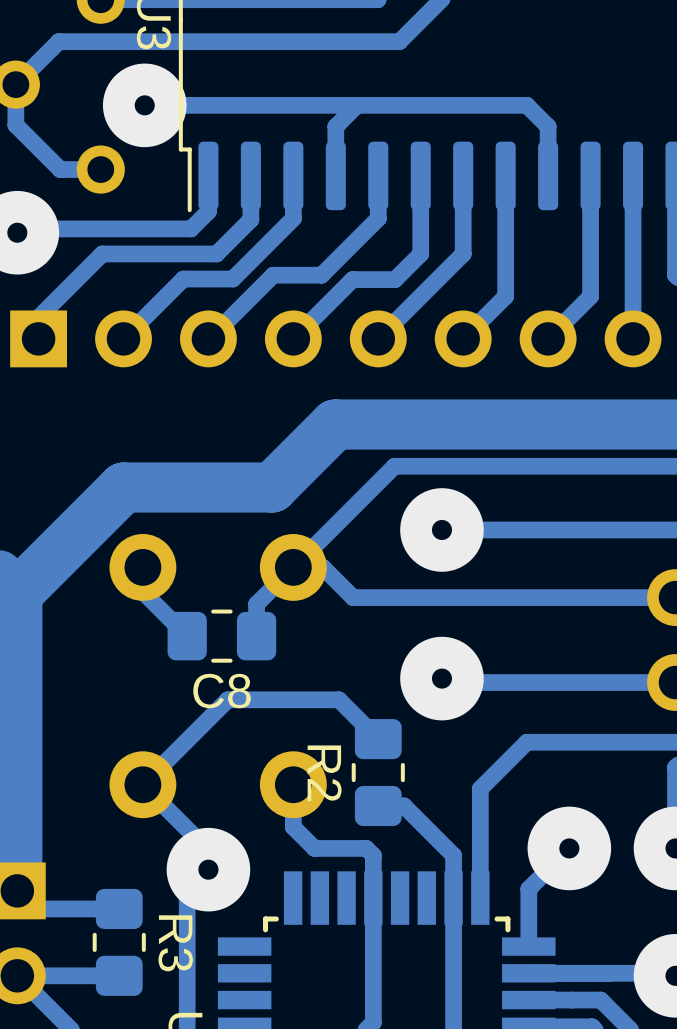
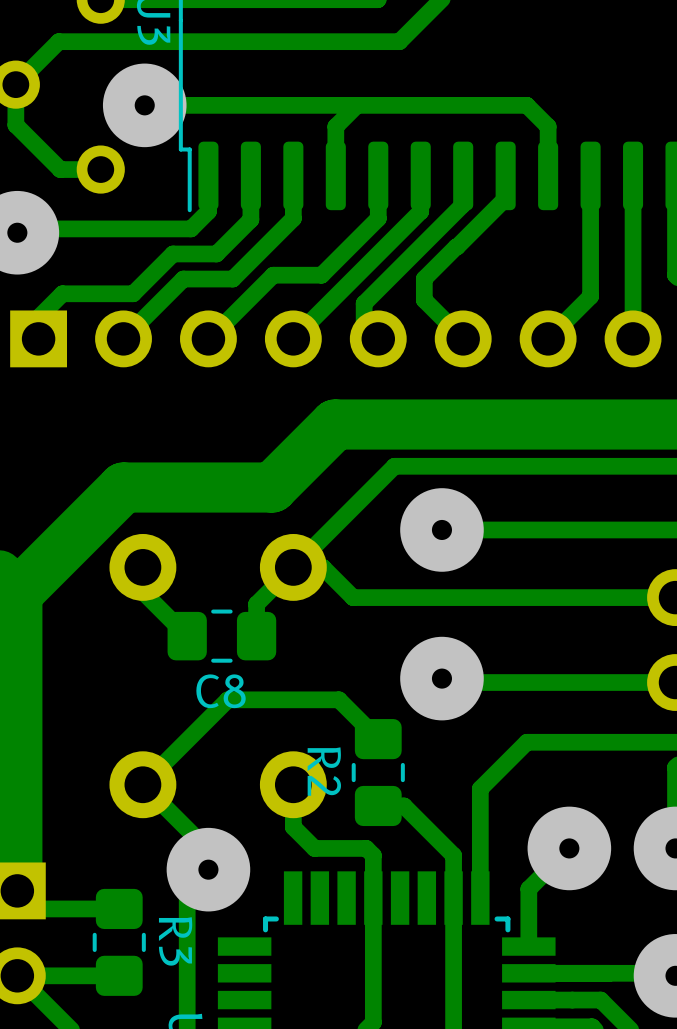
track: (505, 198) (505, 296) (463, 338) -> (505, 198) (424, 278) (424, 300) (463, 338)
track: (463, 204) (463, 253) (378, 338) -> (463, 204) (364, 303) (364, 324) (378, 338)
track: (420, 211) (420, 253) (395, 279) (352, 279) -> (420, 211) (352, 279)
track: (172, 253) (102, 253) (62, 293) -> (172, 253) (133, 293) (62, 293)

